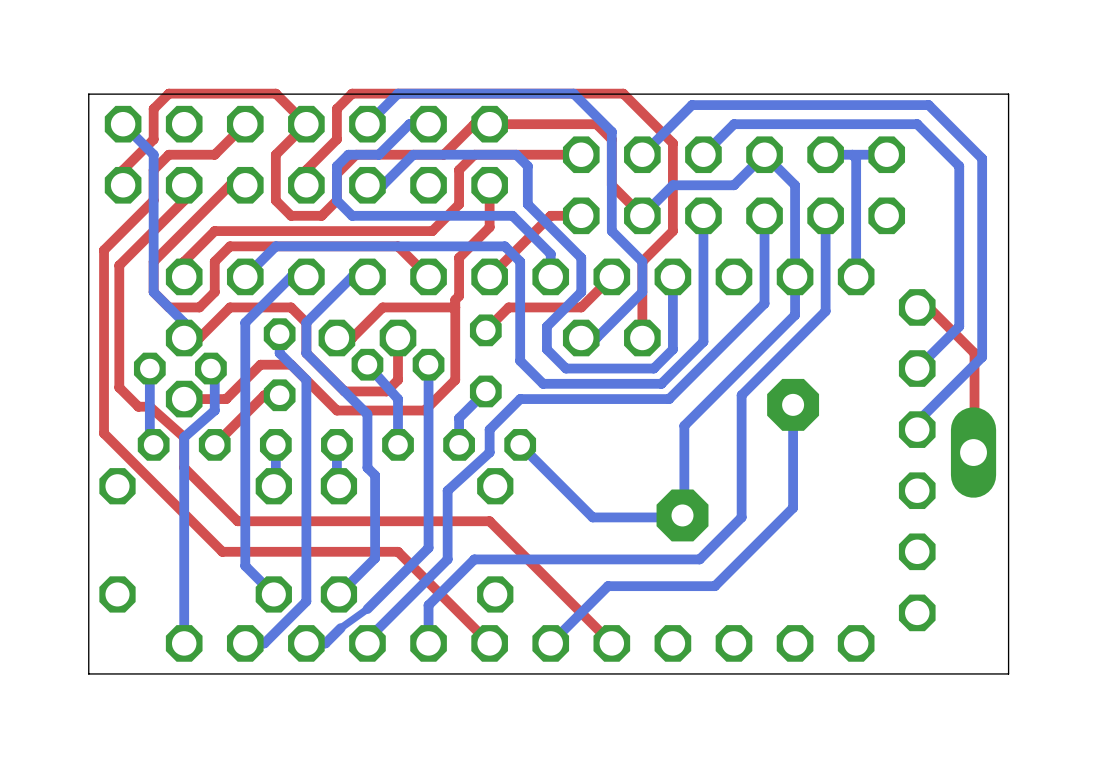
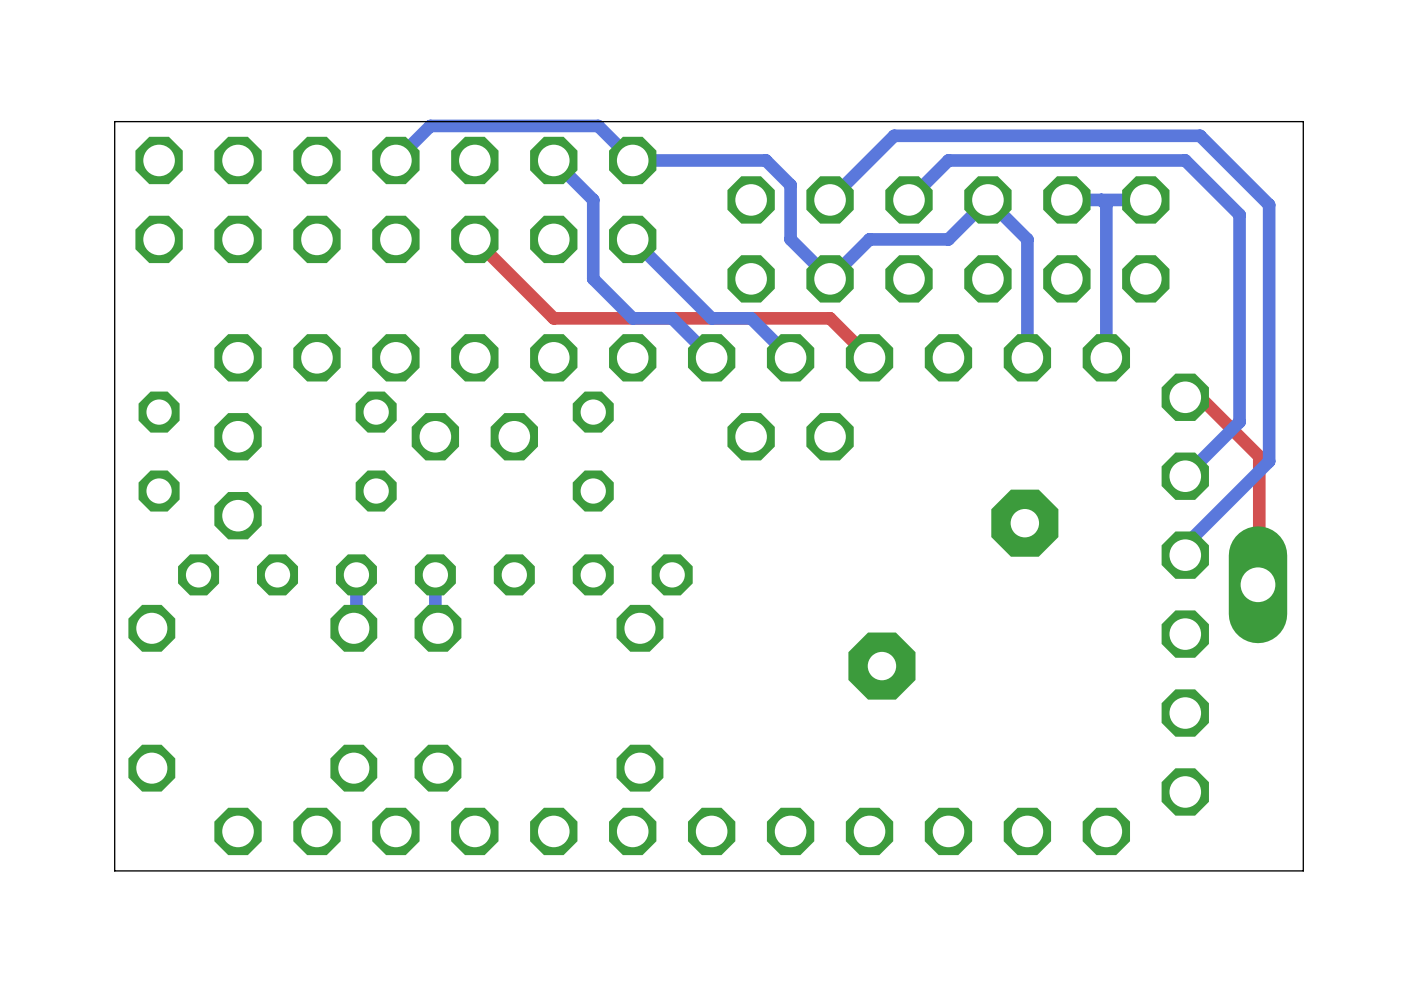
bottom track: (123, 124) (153, 154) (153, 292) (184, 322) (184, 337) -> none
top track: (245, 124) (214, 154) (168, 154) (153, 170) (153, 200) (104, 250) (104, 433) (222, 551) (398, 551) (489, 643) -> none
bottom track: (367, 124) (398, 93) (573, 93) (611, 131) (611, 143) -> (395, 160) (430, 125) (598, 125) (632, 160) (765, 160) (790, 185)
bottom track: (428, 124) (409, 124) (378, 154) (348, 154) (336, 166) (336, 200) (352, 215) (512, 215) (550, 253) (550, 276) -> (553, 160) (593, 199) (593, 278) (632, 318)
top track: (581, 154) (474, 154) (459, 170) (459, 204) (432, 231) (214, 231) (184, 261) (184, 276) -> none
top track: (123, 185) (123, 170) (153, 139) (153, 108) (168, 93) (275, 93) (306, 124) (275, 154) (275, 200) (291, 215) (321, 215) (336, 200) (336, 173) (356, 154) (443, 154) (474, 124) (596, 124) (611, 139) (611, 185) (642, 215) -> none
top track: (184, 185) (184, 200) (119, 265) (119, 387) (138, 406) (149, 406) (184, 437) (184, 467) (237, 521) (489, 521) (611, 643) -> none
top track: (245, 185) (230, 185) (153, 261) (153, 292) (168, 307) (199, 307) (214, 292) (214, 261) (230, 246) (398, 246) (428, 276) -> none
top track: (306, 185) (306, 170) (336, 139) (336, 108) (352, 93) (623, 93) (672, 143) (672, 231) (642, 261) (642, 337) -> none
bottom track: (367, 185) (382, 185) (413, 154) (516, 154) (527, 166) (527, 204) (581, 257) (581, 292) (546, 326) (546, 349) (565, 368) (653, 368) (672, 349) (672, 276) -> none
top track: none -> (474, 239) (553, 318) (830, 318) (869, 357)
bottom track: none -> (632, 239) (711, 318) (751, 318) (790, 357)
top track: (489, 185) (489, 227) (459, 257) (459, 295) (455, 299) (455, 379) (424, 410) (336, 410) (291, 364) (260, 364) (226, 399) (184, 399) -> none
bottom track: (611, 185) (611, 231) (642, 261) (642, 292) (596, 337) (581, 337) -> (790, 239) (830, 278)
top track: (581, 215) (550, 215) (489, 276) -> none
bottom track: (703, 215) (703, 341) (661, 383) (543, 383) (520, 360) (520, 261) (504, 246) -> (711, 357) (672, 318) (652, 318)
bottom track: (764, 215) (764, 303) (669, 399) (520, 399) (489, 429) (489, 452) (447, 490) (447, 559) (367, 639) (367, 643) -> none
bottom track: (825, 215) (825, 311) (741, 395) (741, 517) (699, 559) (474, 559) (428, 605) (428, 643) -> none
bottom track: (489, 246) (275, 246) (245, 276) -> none
bottom track: (306, 276) (291, 276) (245, 322) (245, 565) (273, 594) -> none
bottom track: (367, 276) (352, 276) (306, 322) (306, 353) (367, 414) (367, 467) (375, 475) (375, 558) (338, 594) -> none
top track: (611, 276) (581, 307) (508, 307) (485, 330) -> none
bottom track: (795, 276) (795, 315) (684, 425) (684, 513) (680, 517) (592, 517) (520, 444) -> none
top track: (455, 307) (382, 307) (352, 337) (336, 337) -> none
bottom track: (279, 334) (279, 353) (306, 379) (306, 601) (264, 643) (245, 643) -> none
top track: (398, 337) (398, 379) (386, 391) (344, 391) (306, 353) (306, 322) (291, 307) (230, 307) (199, 337) (184, 337) -> none
part position: (485, 360) -> (593, 451)
part position: (279, 364) -> (376, 451)
bottom track: (367, 364) (398, 399) (398, 444) -> none
part: (398, 364) -> none
bottom track: (428, 364) (428, 547) (367, 609) (340, 628) (325, 643) (306, 643) -> none
bottom track: (149, 368) (149, 441) (153, 444) -> none
part rotation: 0° (180, 368) -> 90° clockwise (159, 451)
part position: (180, 368) -> (159, 451)
bottom track: (210, 368) (214, 372) (214, 410) (184, 437) (184, 643) -> none
bottom track: (485, 391) (459, 418) (459, 444) -> none
top track: (279, 395) (264, 395) (214, 444) -> none
bottom track: (793, 404) (793, 507) (714, 586) (607, 586) (550, 643) -> none

